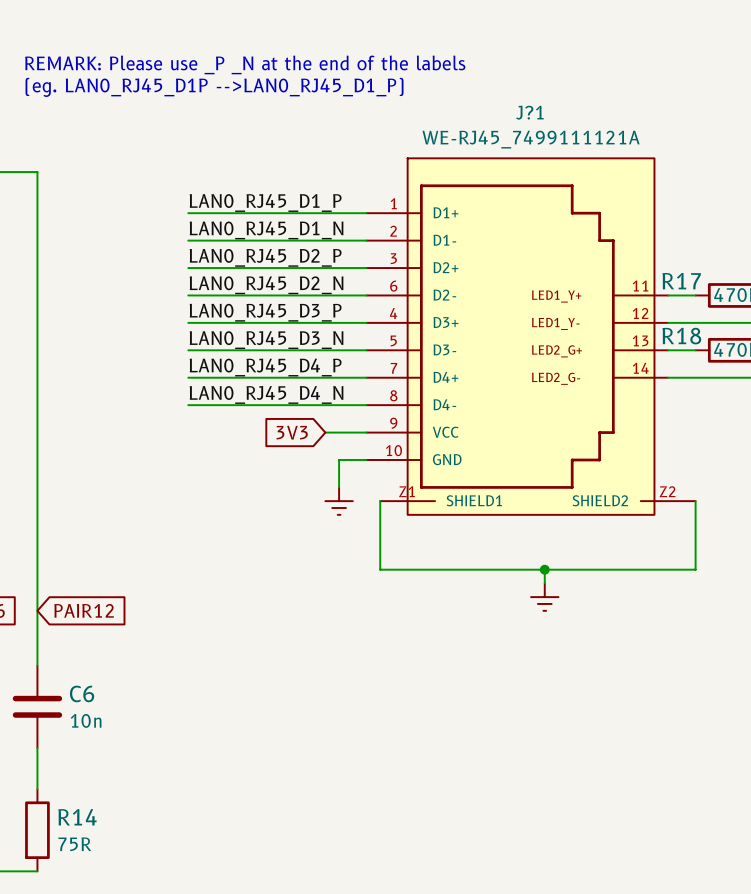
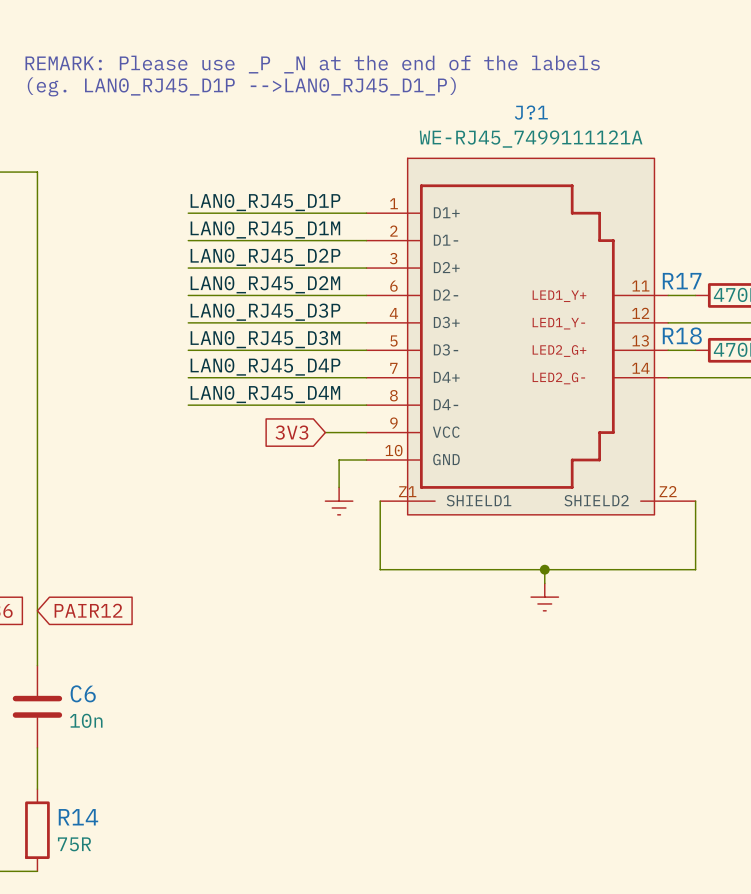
label: LAN0_RJ45_D1_P (265, 203) -> LAN0_RJ45_D1P (265, 202)
label: LAN0_RJ45_D1_N (266, 230) -> LAN0_RJ45_D1M (265, 229)
label: LAN0_RJ45_D2_P (265, 257) -> LAN0_RJ45_D2P (265, 257)
label: LAN0_RJ45_D2_N (266, 285) -> LAN0_RJ45_D2M (265, 284)
label: LAN0_RJ45_D3_P (265, 312) -> LAN0_RJ45_D3P (265, 312)
label: LAN0_RJ45_D3_N (266, 340) -> LAN0_RJ45_D3M (265, 339)
label: LAN0_RJ45_D4_P (265, 367) -> LAN0_RJ45_D4P (265, 367)
label: LAN0_RJ45_D4_N (266, 394) -> LAN0_RJ45_D4M (265, 394)

